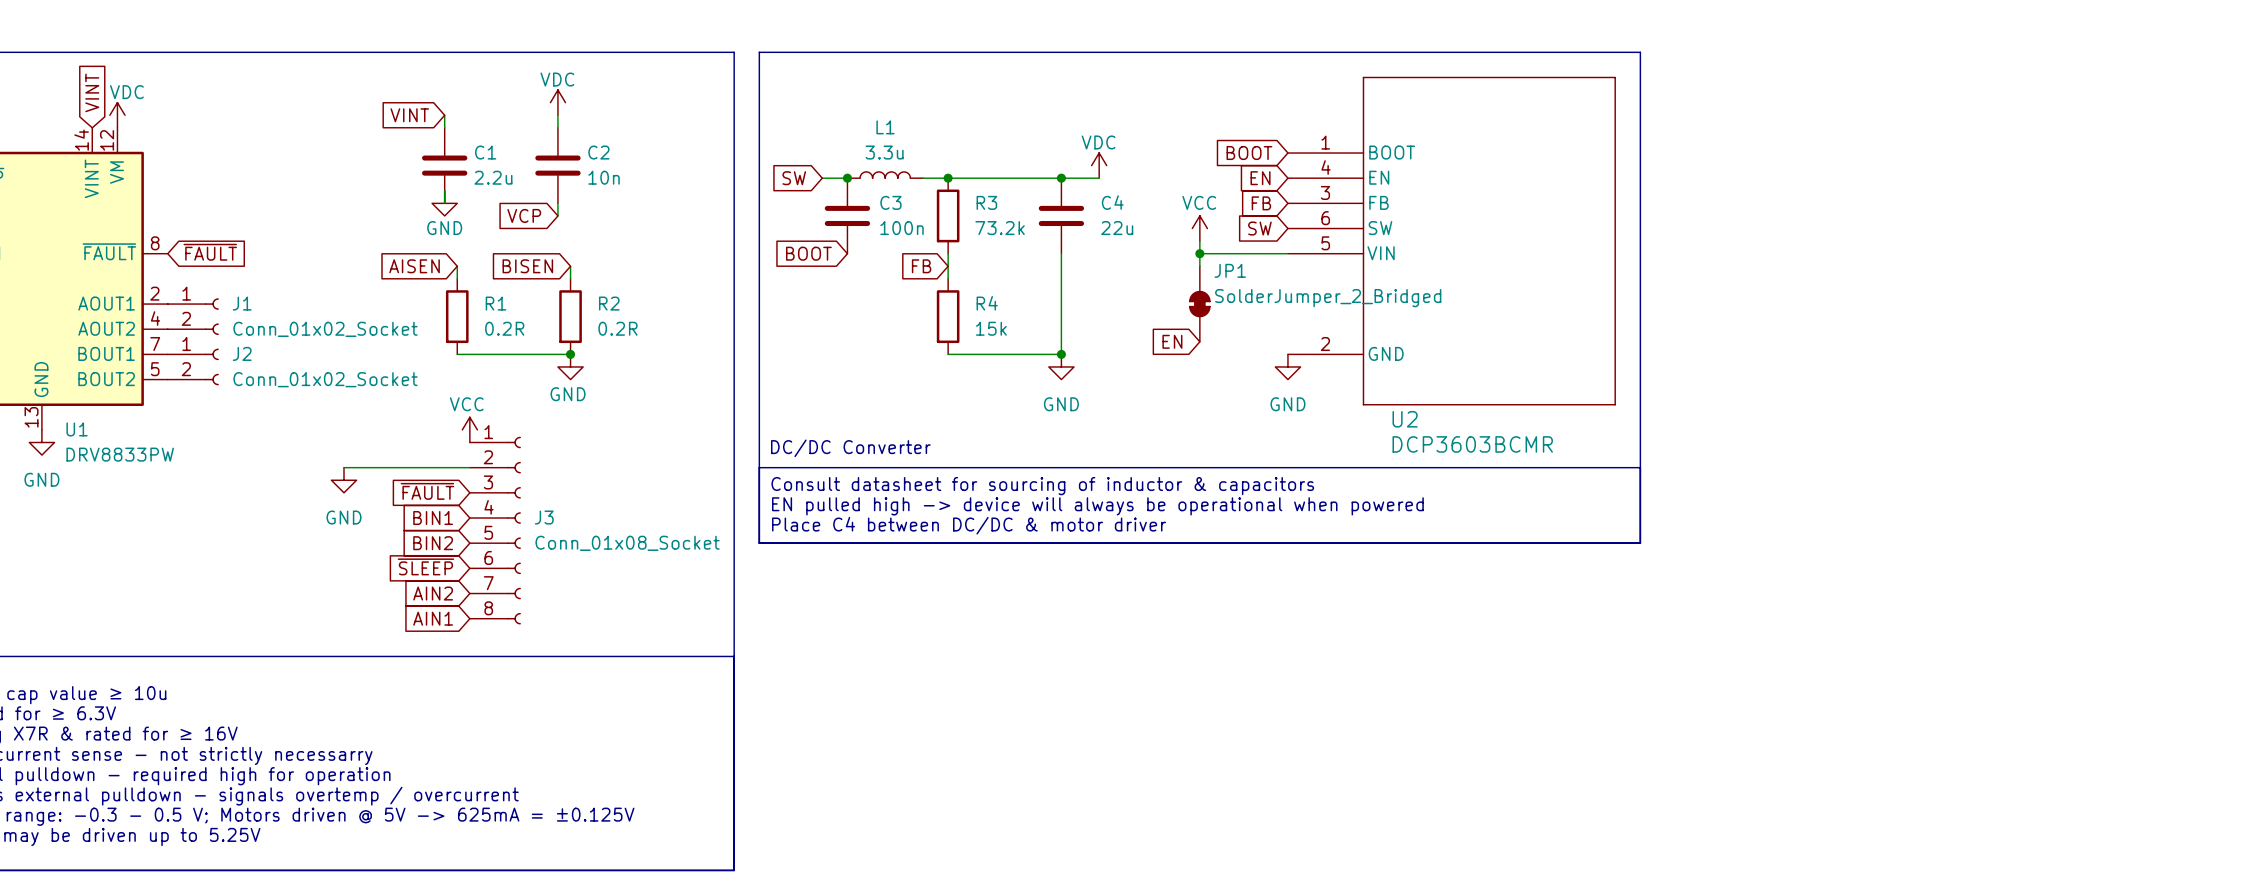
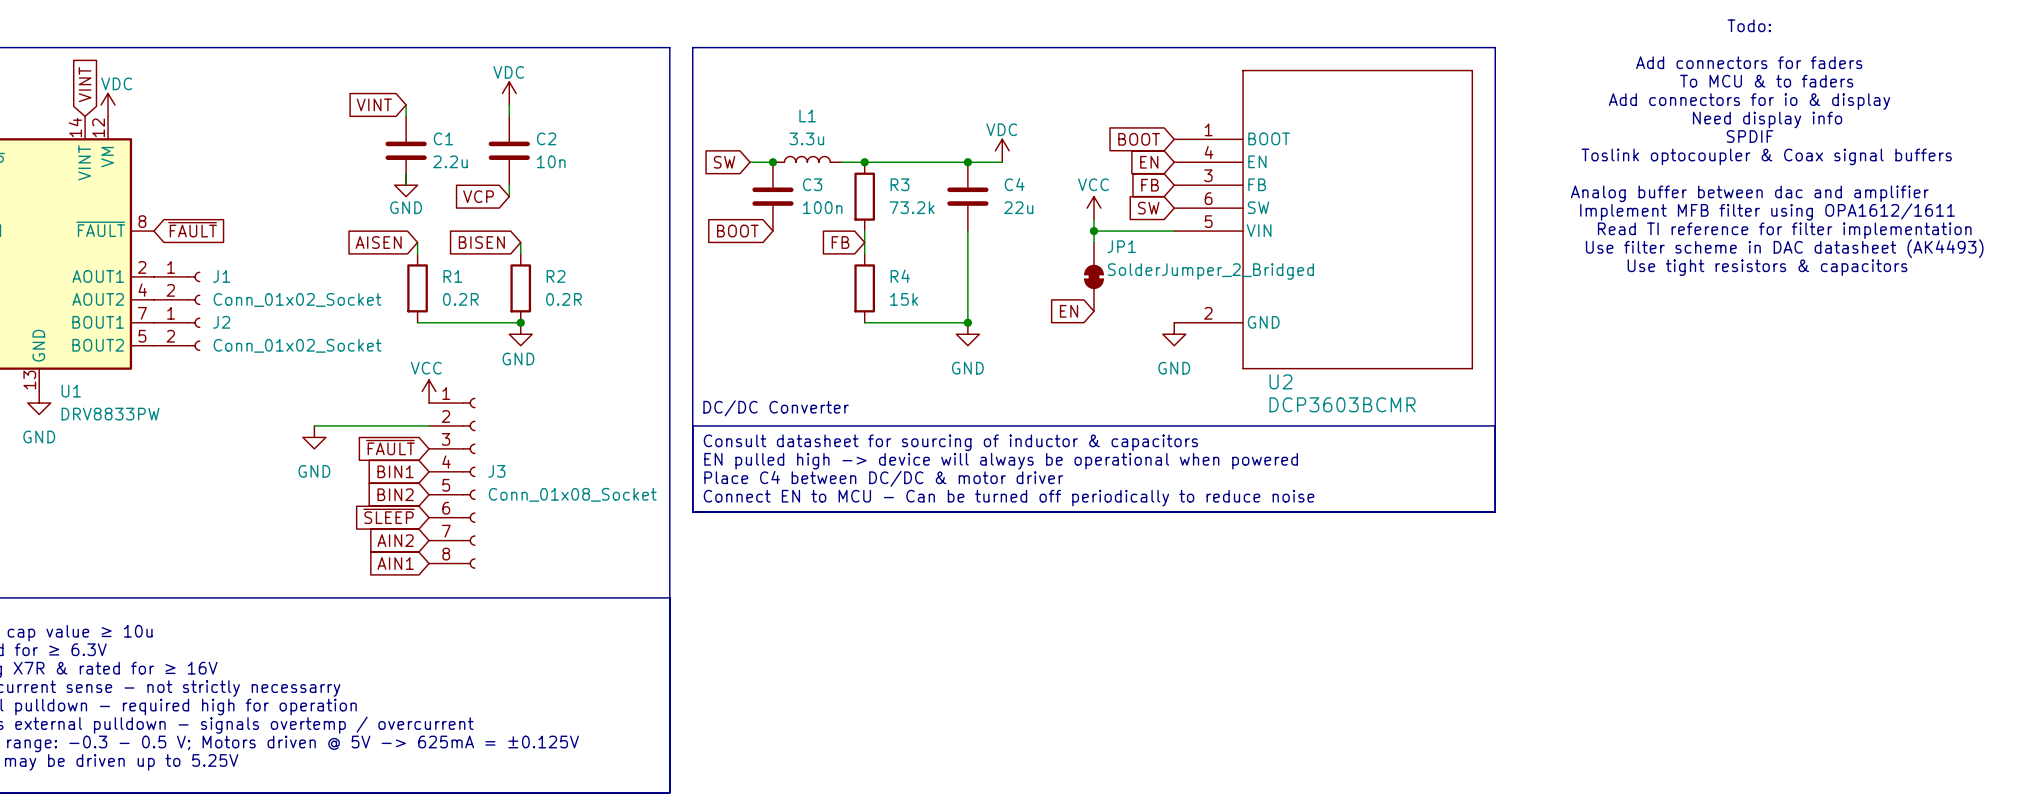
text: none -> Todo: (1749, 25)
text: none -> Add connectors for faders (1749, 62)
text: none -> To MCU & to faders (1766, 81)
text: none -> Add connectors for io & display (1749, 101)
text: none -> Need display info (1767, 119)
text: none -> SPDIF (1750, 136)
text: none -> Toslink optocoupler & Coax signal buffers (1766, 156)
text: none -> Analog buffer between dac and amplifier (1749, 193)
text: none -> Implement MFB filter using OPA1612/1611 (1767, 212)
text: none -> Read TI reference for filter implementation (1784, 230)
text: none -> Use filter scheme in DAC datasheet (AK4493) (1784, 248)
text: none -> Use tight resistors & capacitors (1767, 267)
line: (759, 543) (1640, 543) -> (692, 494) (692, 511) (1495, 511) (1495, 494)
text: none -> Connect EN to MCU - Can be turned off periodically to reduce noise (1009, 498)
line: none -> (692, 511) (1495, 511)

